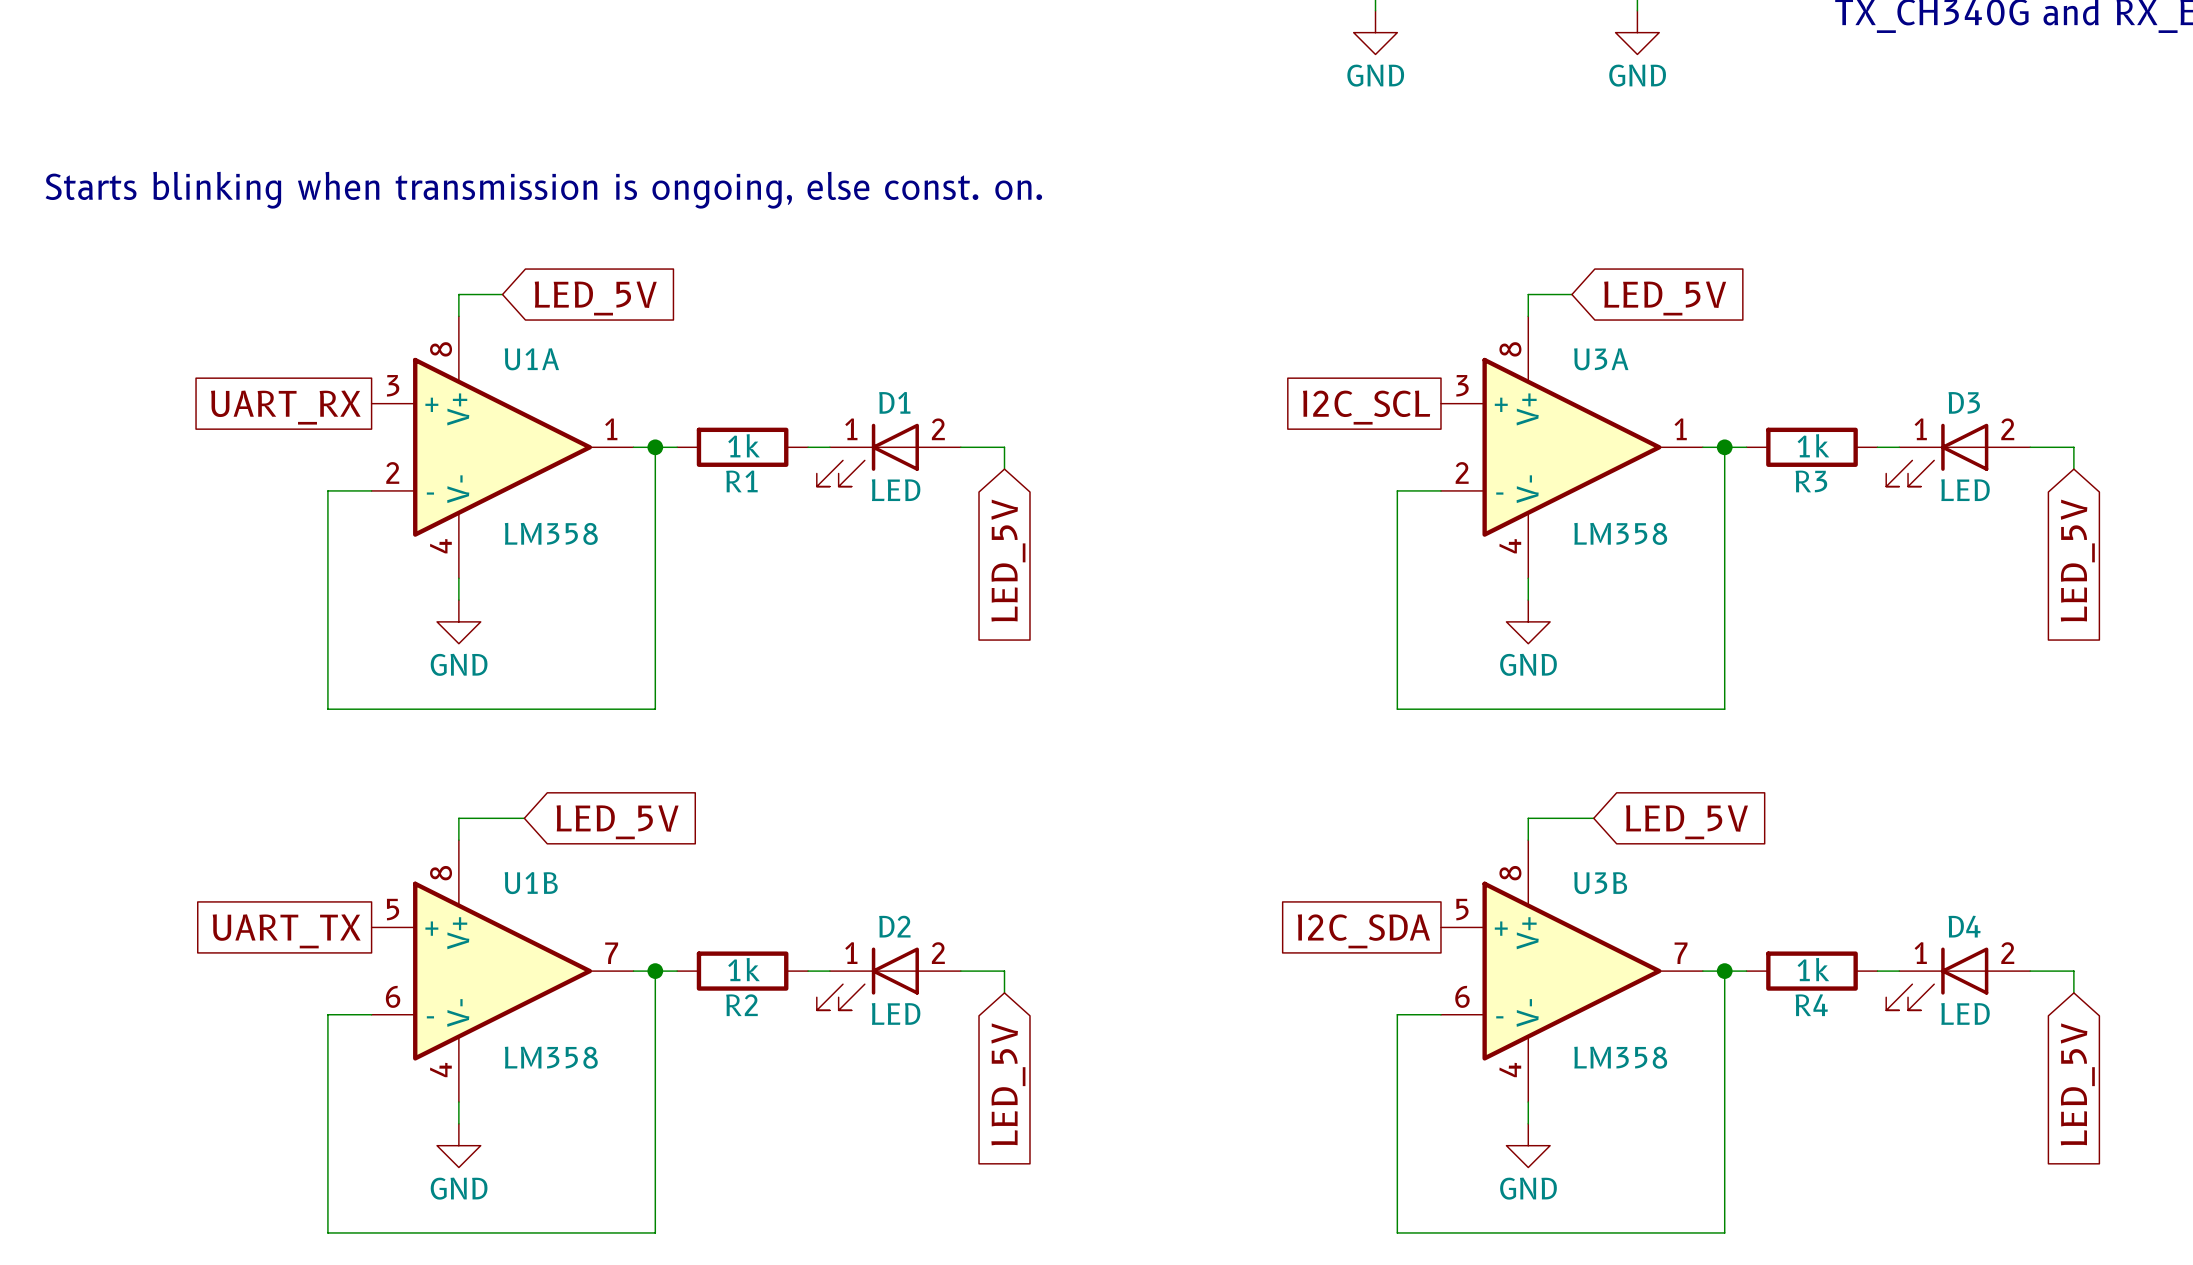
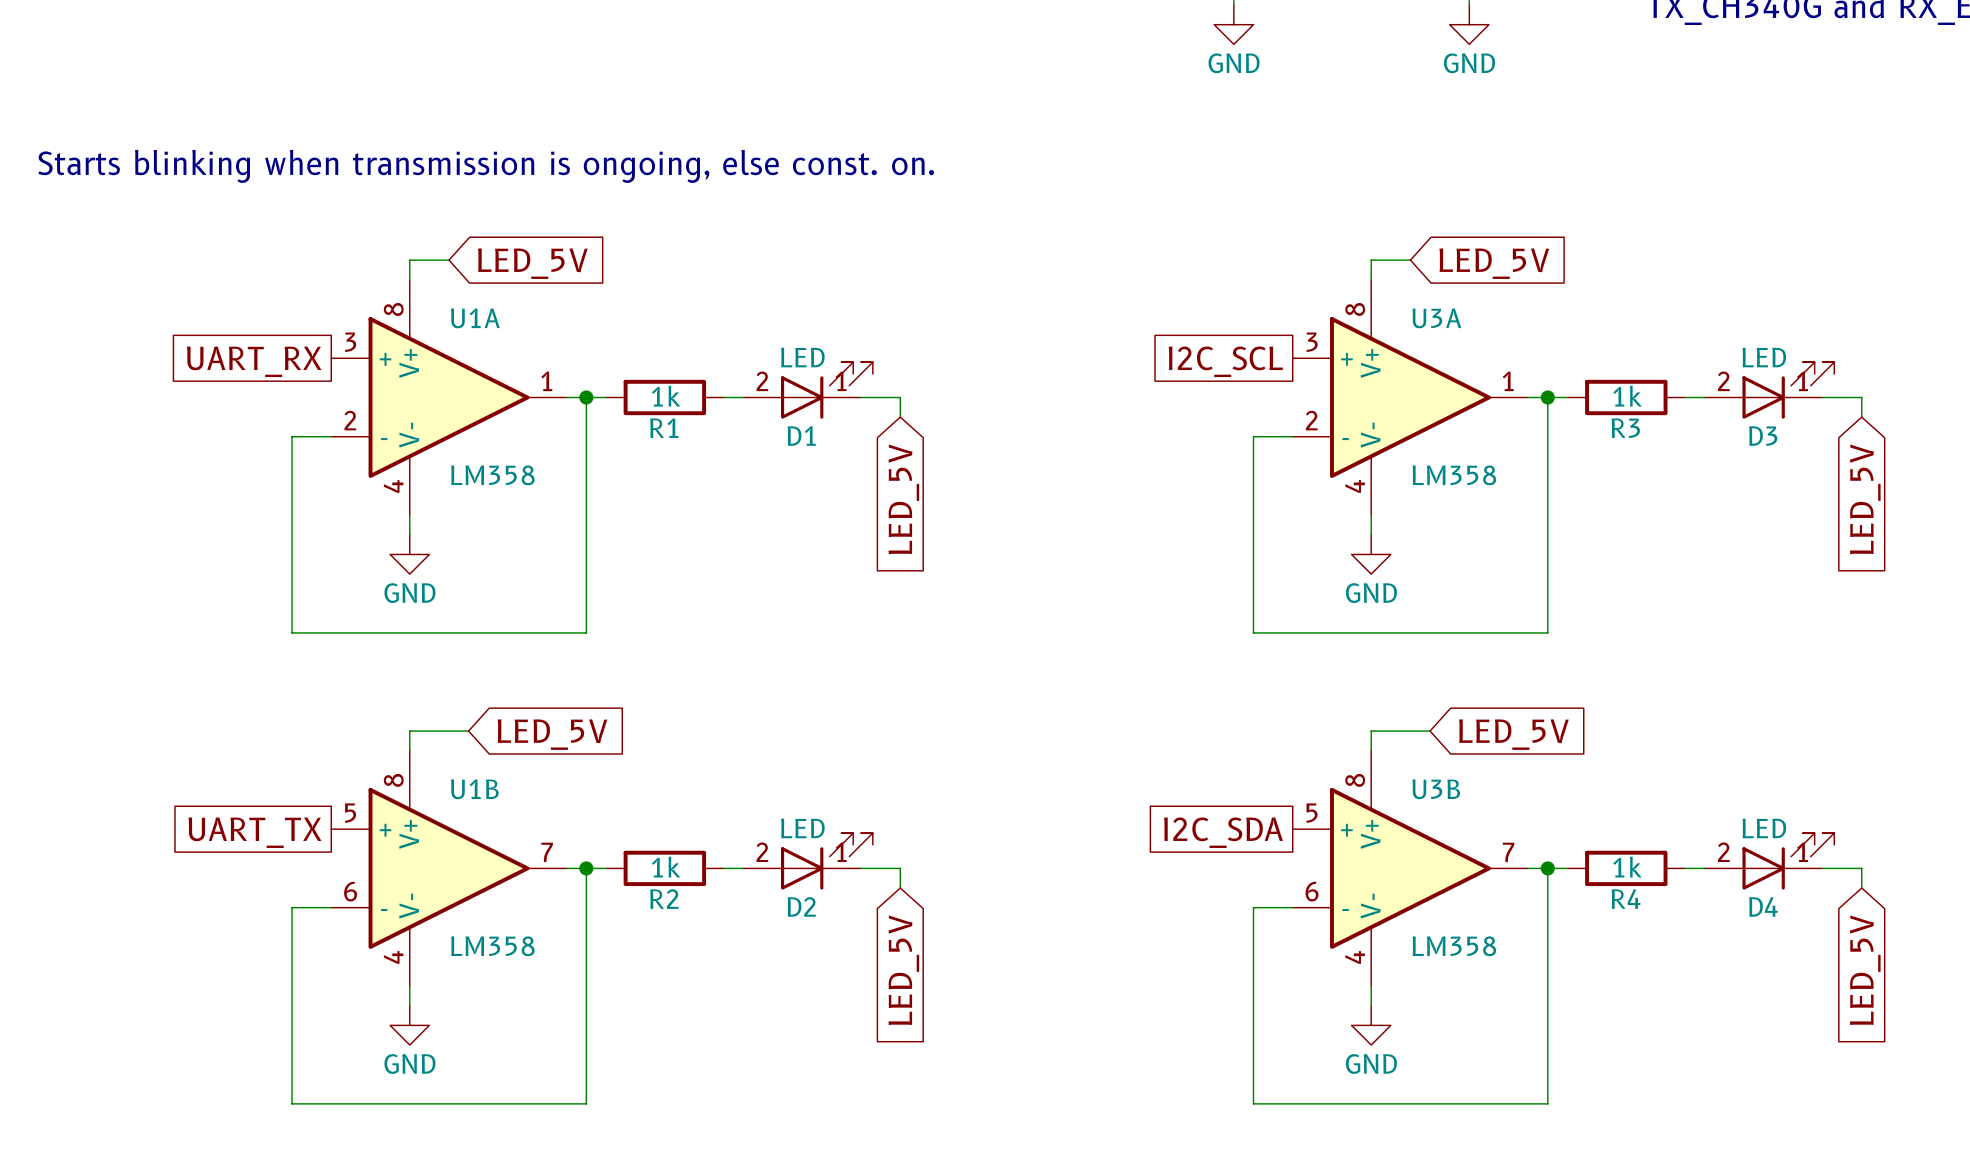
D1 rotation: 0° (867, 455) -> 180° (826, 390)
D3 rotation: 0° (1937, 455) -> 180° (1788, 390)
D2 rotation: 0° (867, 978) -> 180° (826, 861)
D4 rotation: 0° (1937, 978) -> 180° (1788, 861)

